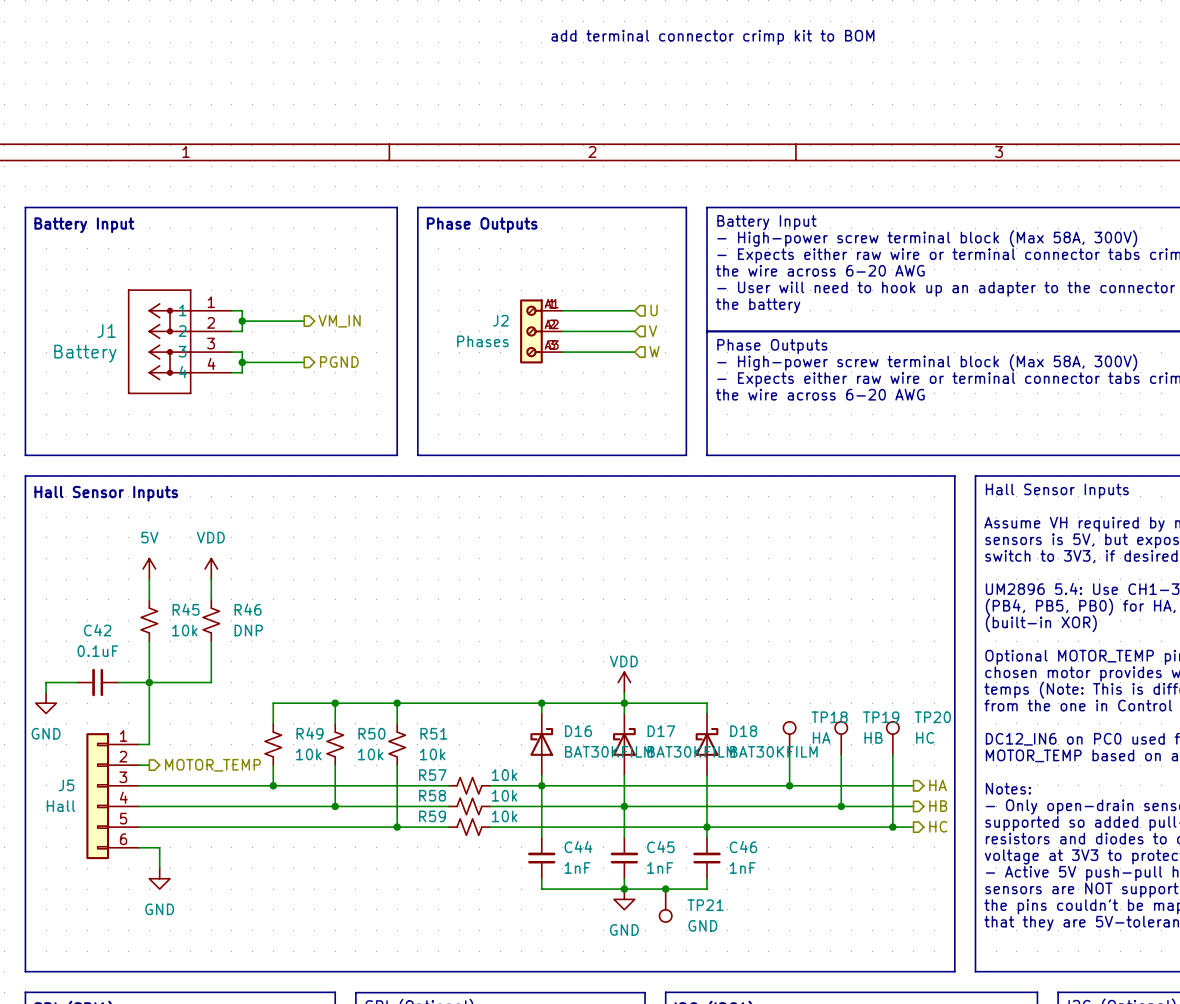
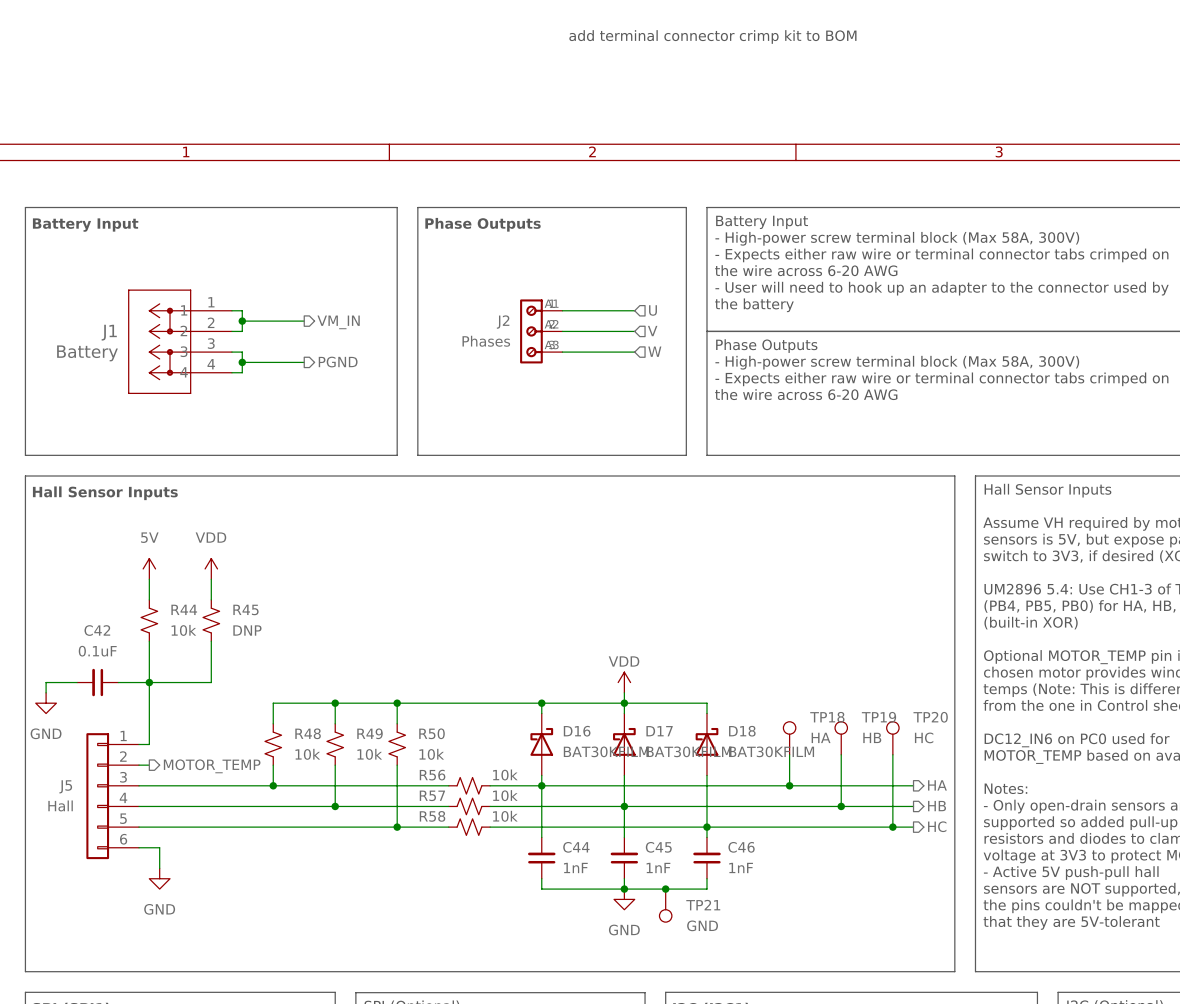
R45 name: R45 (186, 609) -> R44 (184, 609)
R46 name: R46 (248, 609) -> R45 (245, 609)
R49 name: R49 (309, 733) -> R48 (308, 733)
R50 name: R50 (371, 733) -> R49 (370, 733)
R51 name: R51 (433, 733) -> R50 (432, 733)
R57 name: R57 (432, 775) -> R56 (432, 775)
R58 name: R58 (432, 795) -> R57 (432, 795)
R59 name: R59 (432, 816) -> R58 (432, 816)

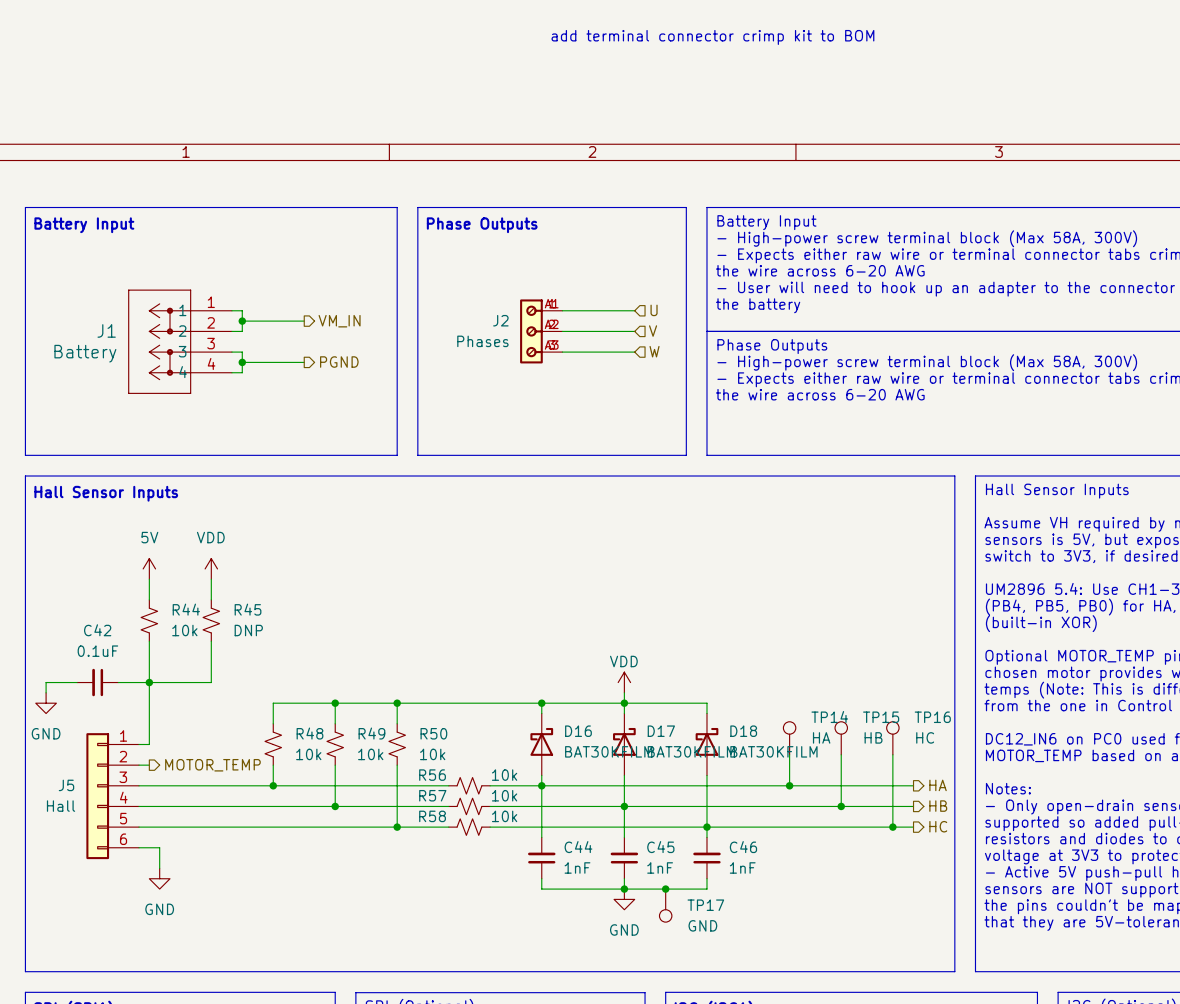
TP18 name: TP18 (827, 717) -> TP14 (829, 717)
TP19 name: TP19 (878, 717) -> TP15 (881, 717)
TP20 name: TP20 (930, 717) -> TP16 (932, 717)
TP21 name: TP21 (703, 905) -> TP17 (705, 905)

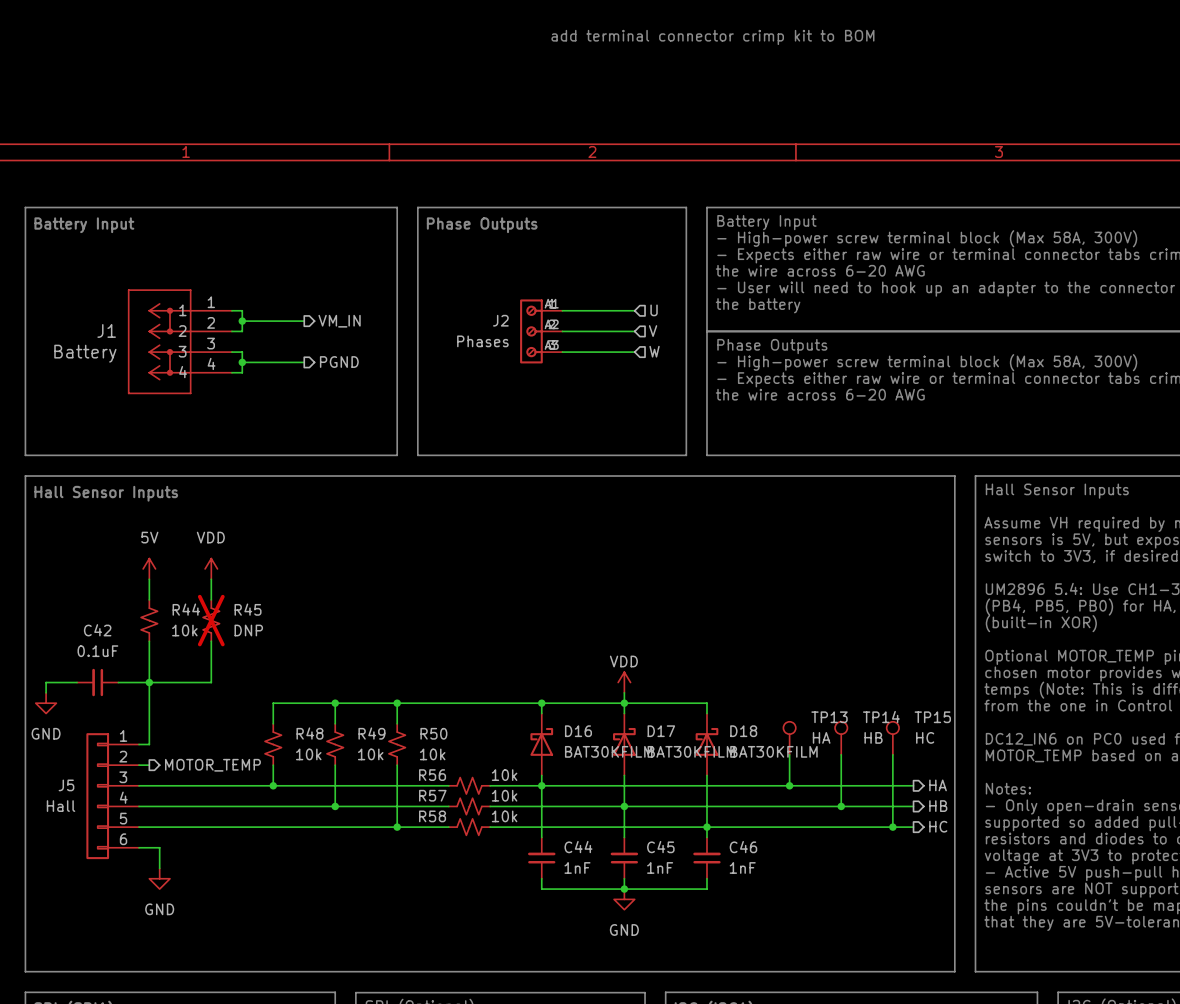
R45 do-not-place cross: none -> (211, 620)
TP14 name: TP14 (829, 717) -> TP13 (829, 717)
TP15 name: TP15 (881, 717) -> TP14 (881, 717)
TP16 name: TP16 (932, 717) -> TP15 (932, 717)
junction: (665, 889) -> none
TP17: GND (665, 905) -> none

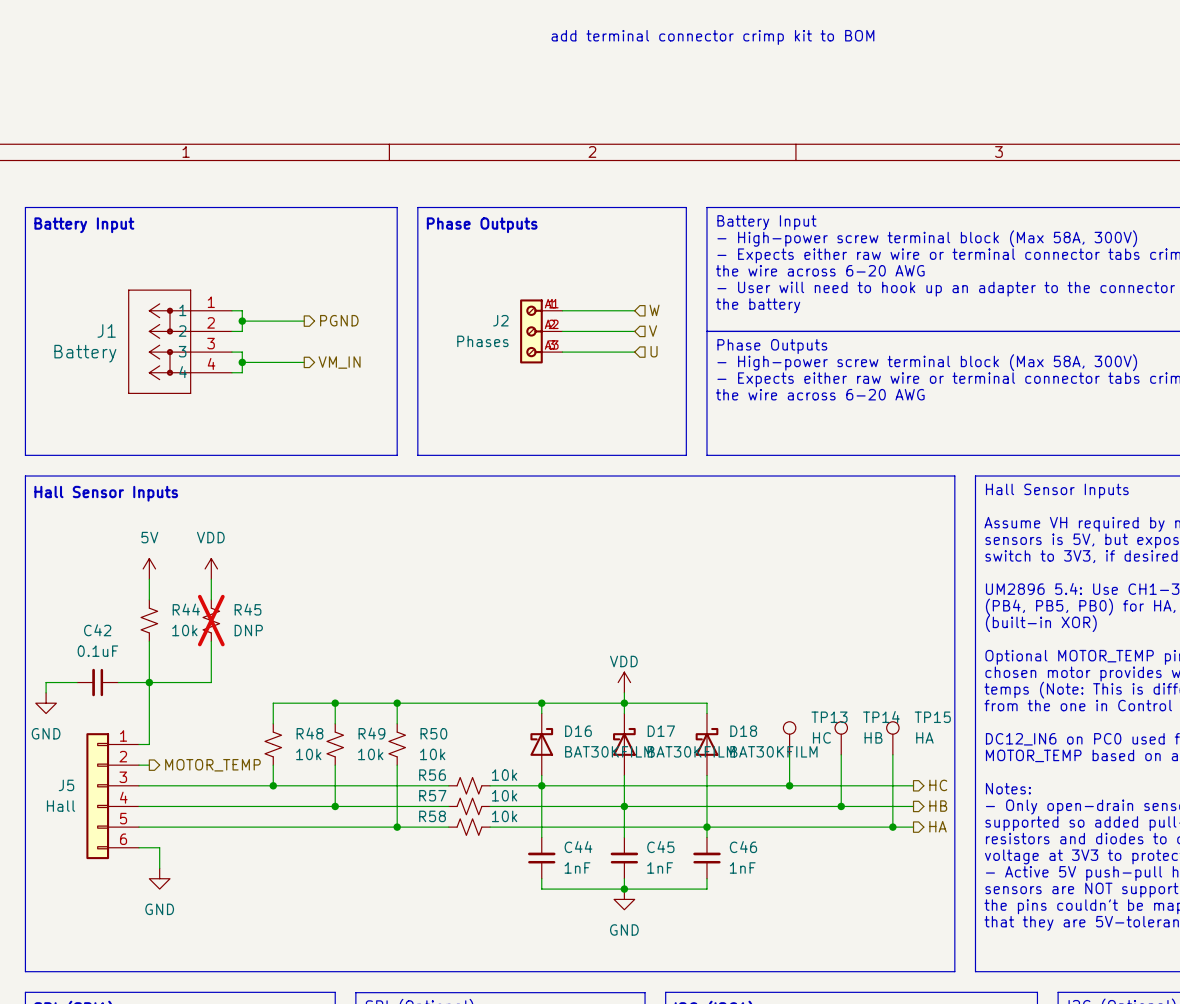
hierarchical label: U (654, 310) -> W (654, 310)
hierarchical label: VM_IN (339, 321) -> PGND (339, 320)
hierarchical label: W (654, 351) -> U (654, 351)
hierarchical label: PGND (339, 362) -> VM_IN (339, 362)
TP13 value: HA (821, 737) -> HC (821, 737)
TP15 value: HC (925, 737) -> HA (924, 737)
hierarchical label: HA (938, 785) -> HC (938, 785)
hierarchical label: HC (938, 826) -> HA (938, 826)

